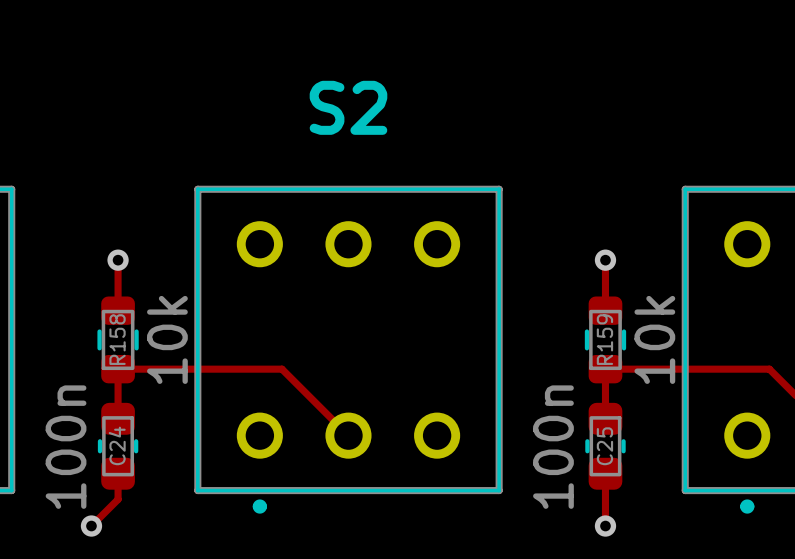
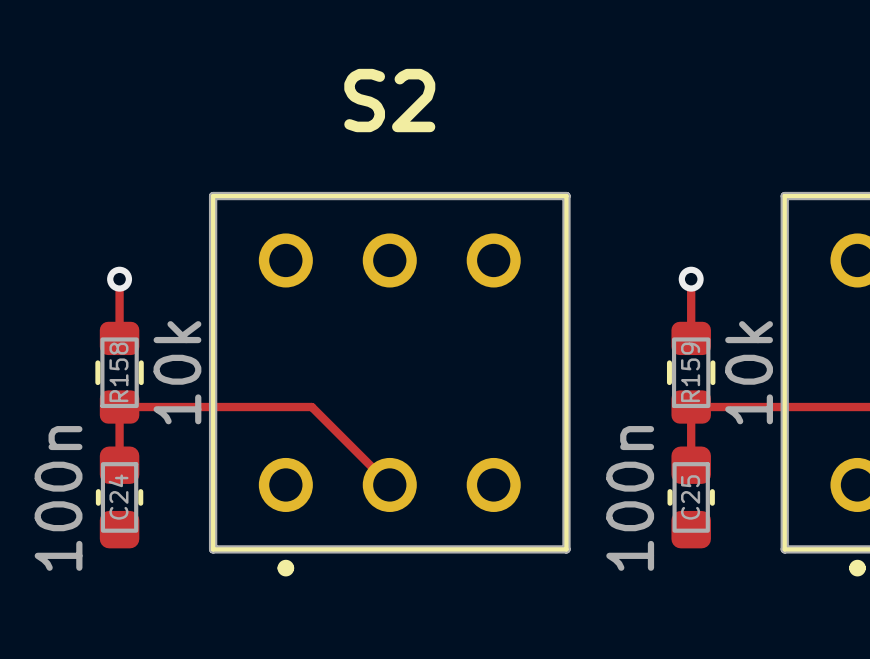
track: (118, 473) (118, 499) (91, 526) -> none
track: (605, 473) (605, 526) -> none
via: (91, 526) -> none
via: (605, 526) -> none

